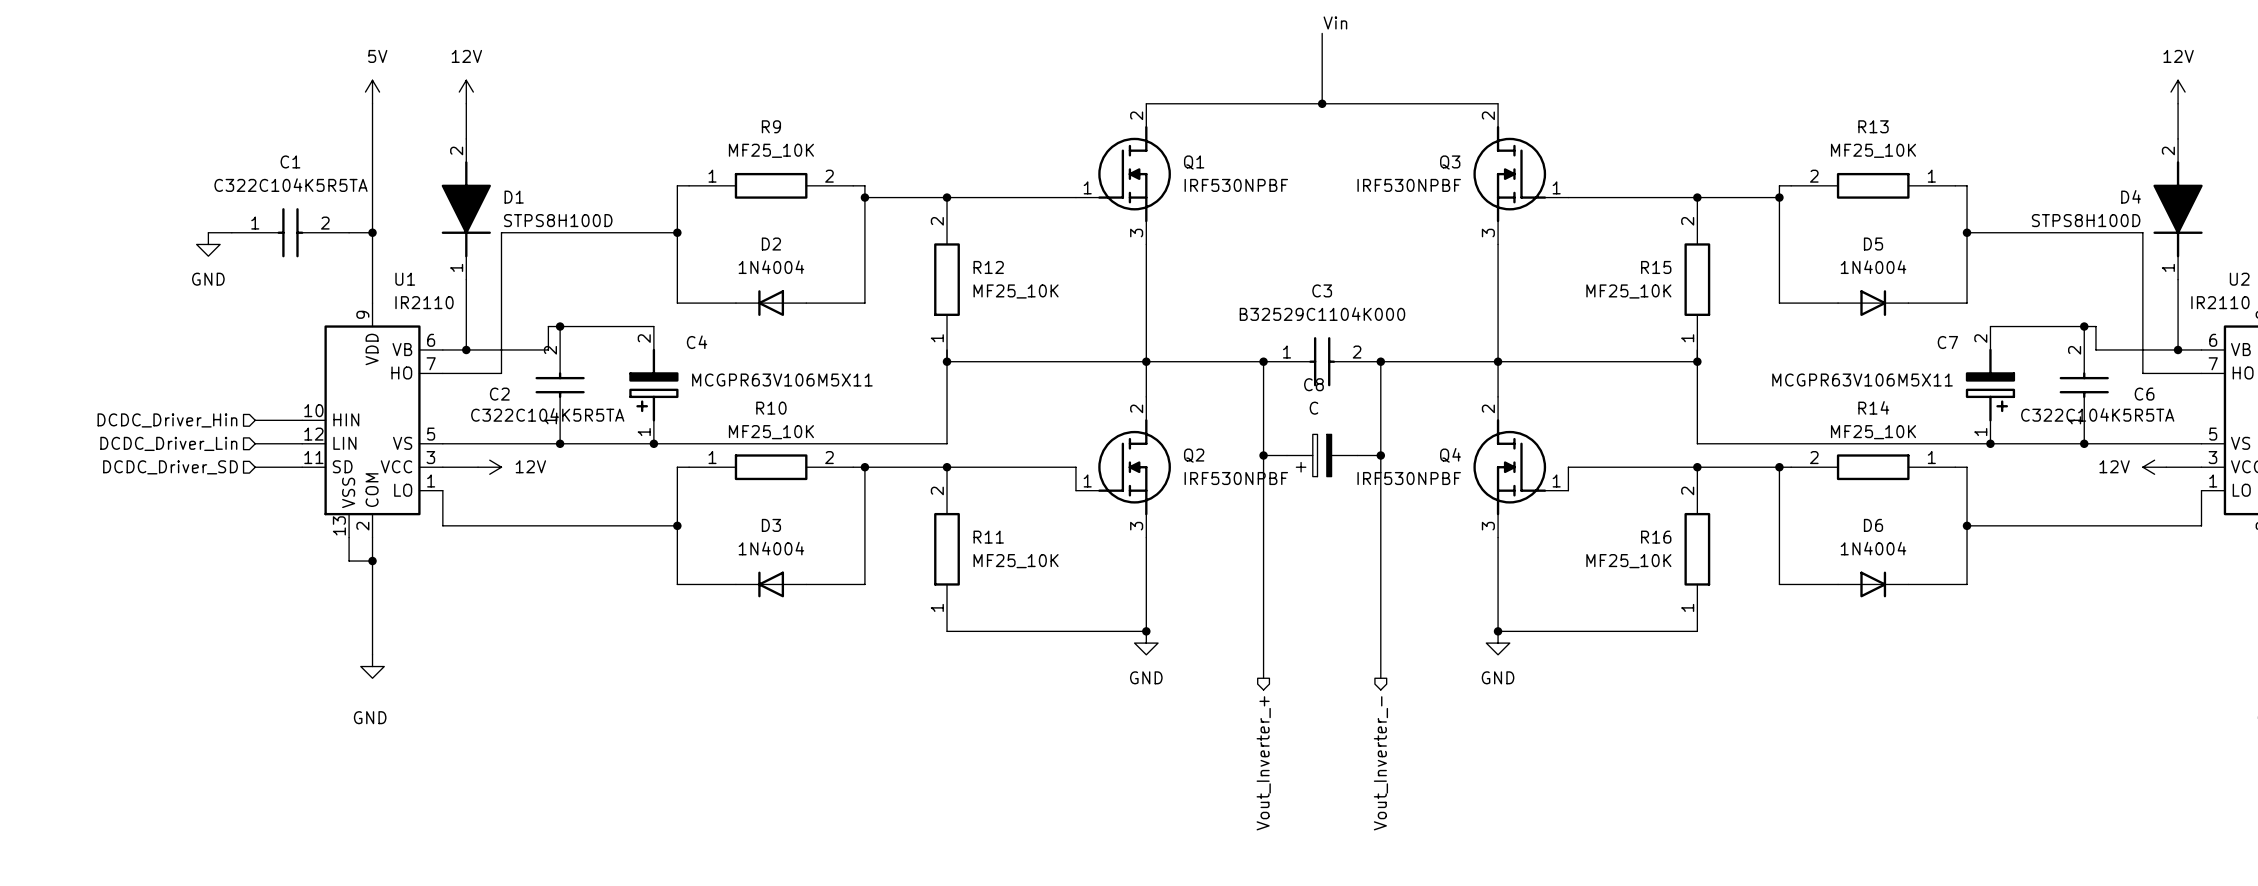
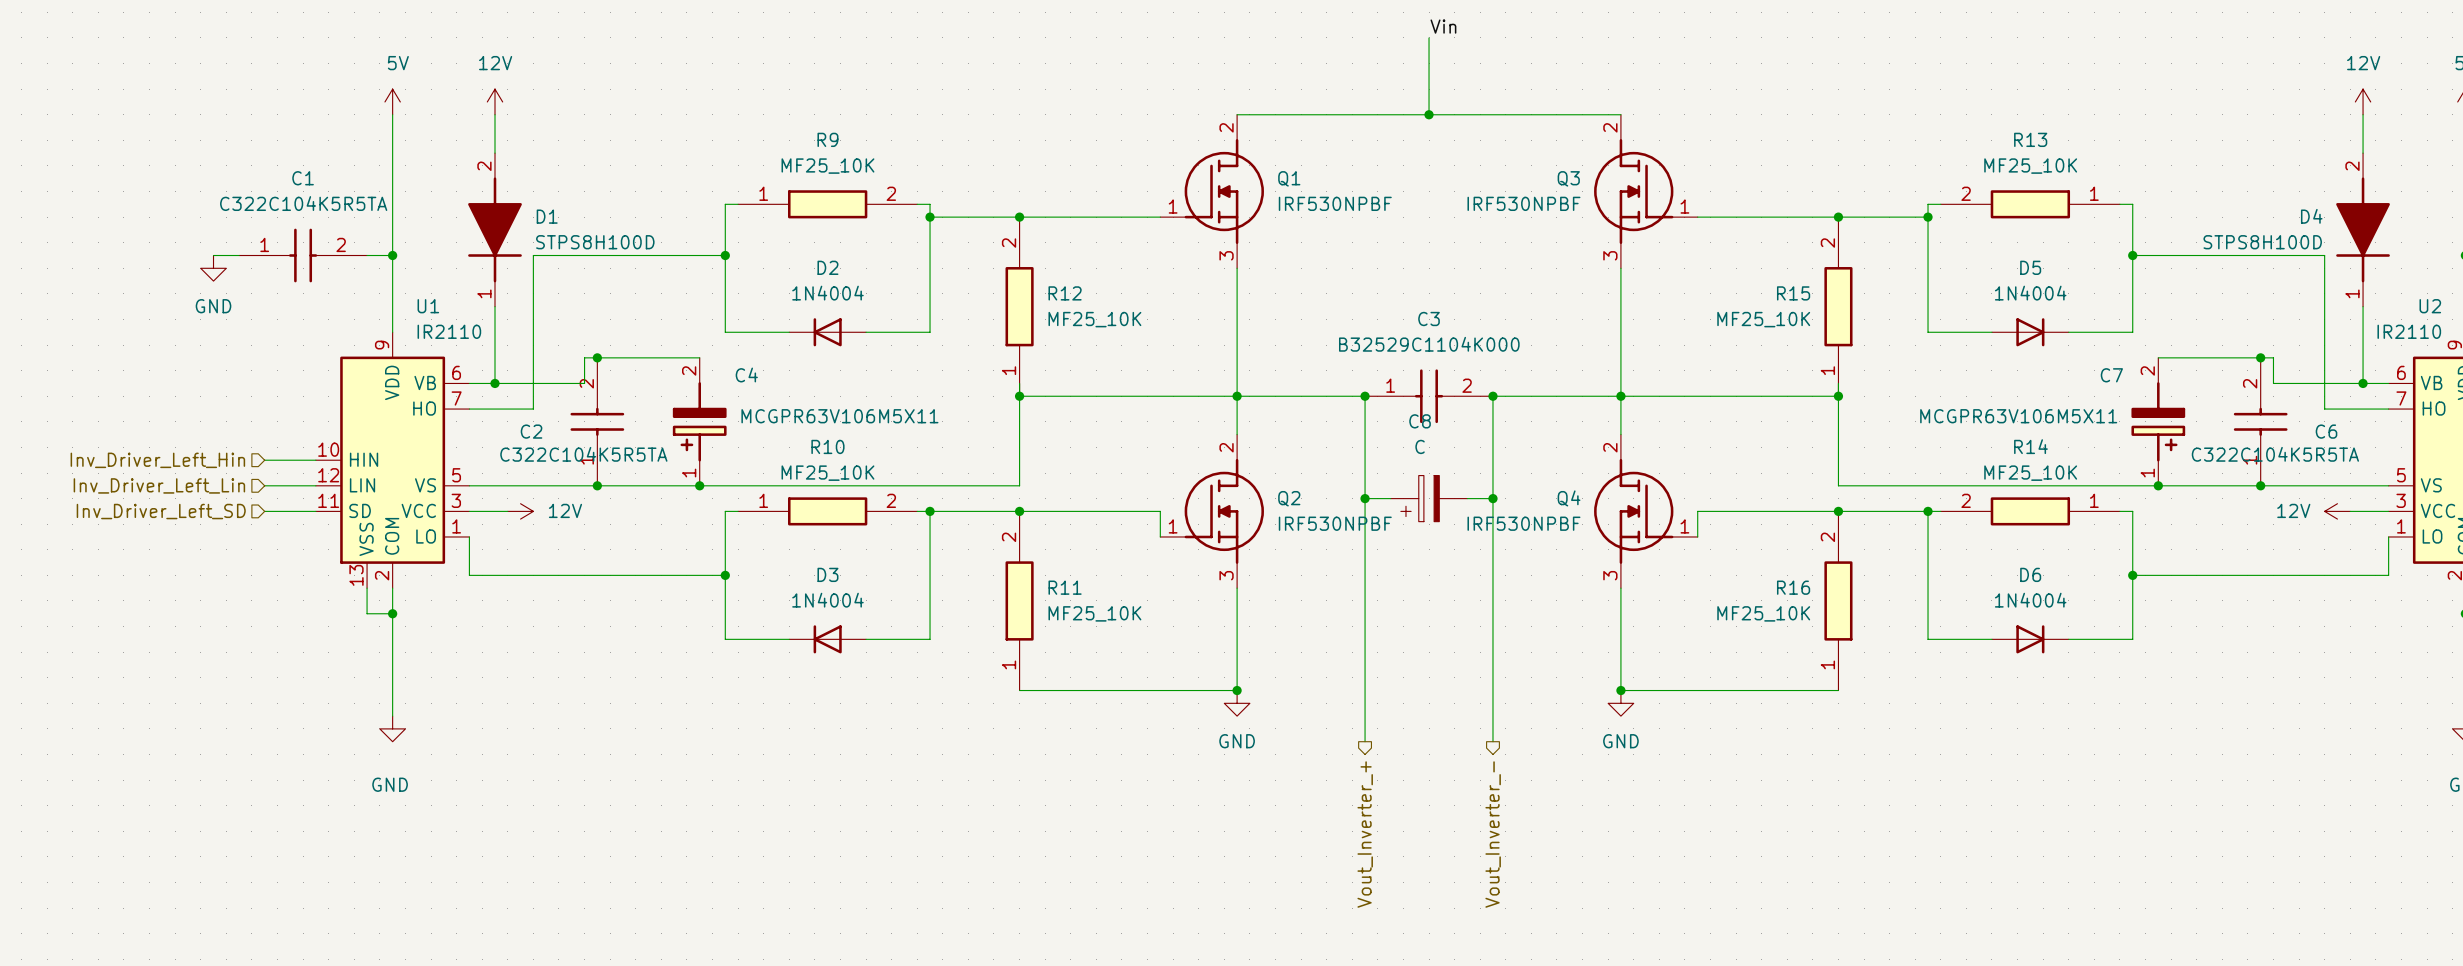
hierarchical label: DCDC_Driver_Hin (167, 420) -> Inv_Driver_Left_Hin (157, 460)
hierarchical label: DCDC_Driver_Lin (168, 443) -> Inv_Driver_Left_Lin (159, 485)
hierarchical label: DCDC_Driver_SD (170, 467) -> Inv_Driver_Left_SD (161, 511)

